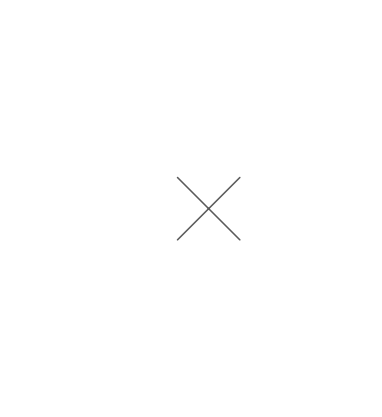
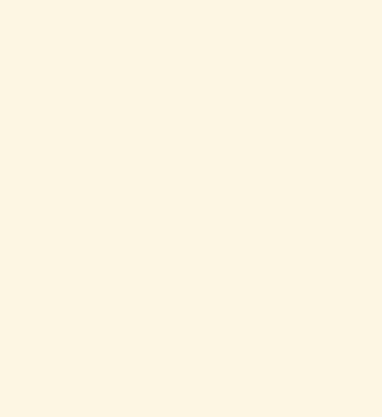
no-connect mark: (208, 208) -> none

